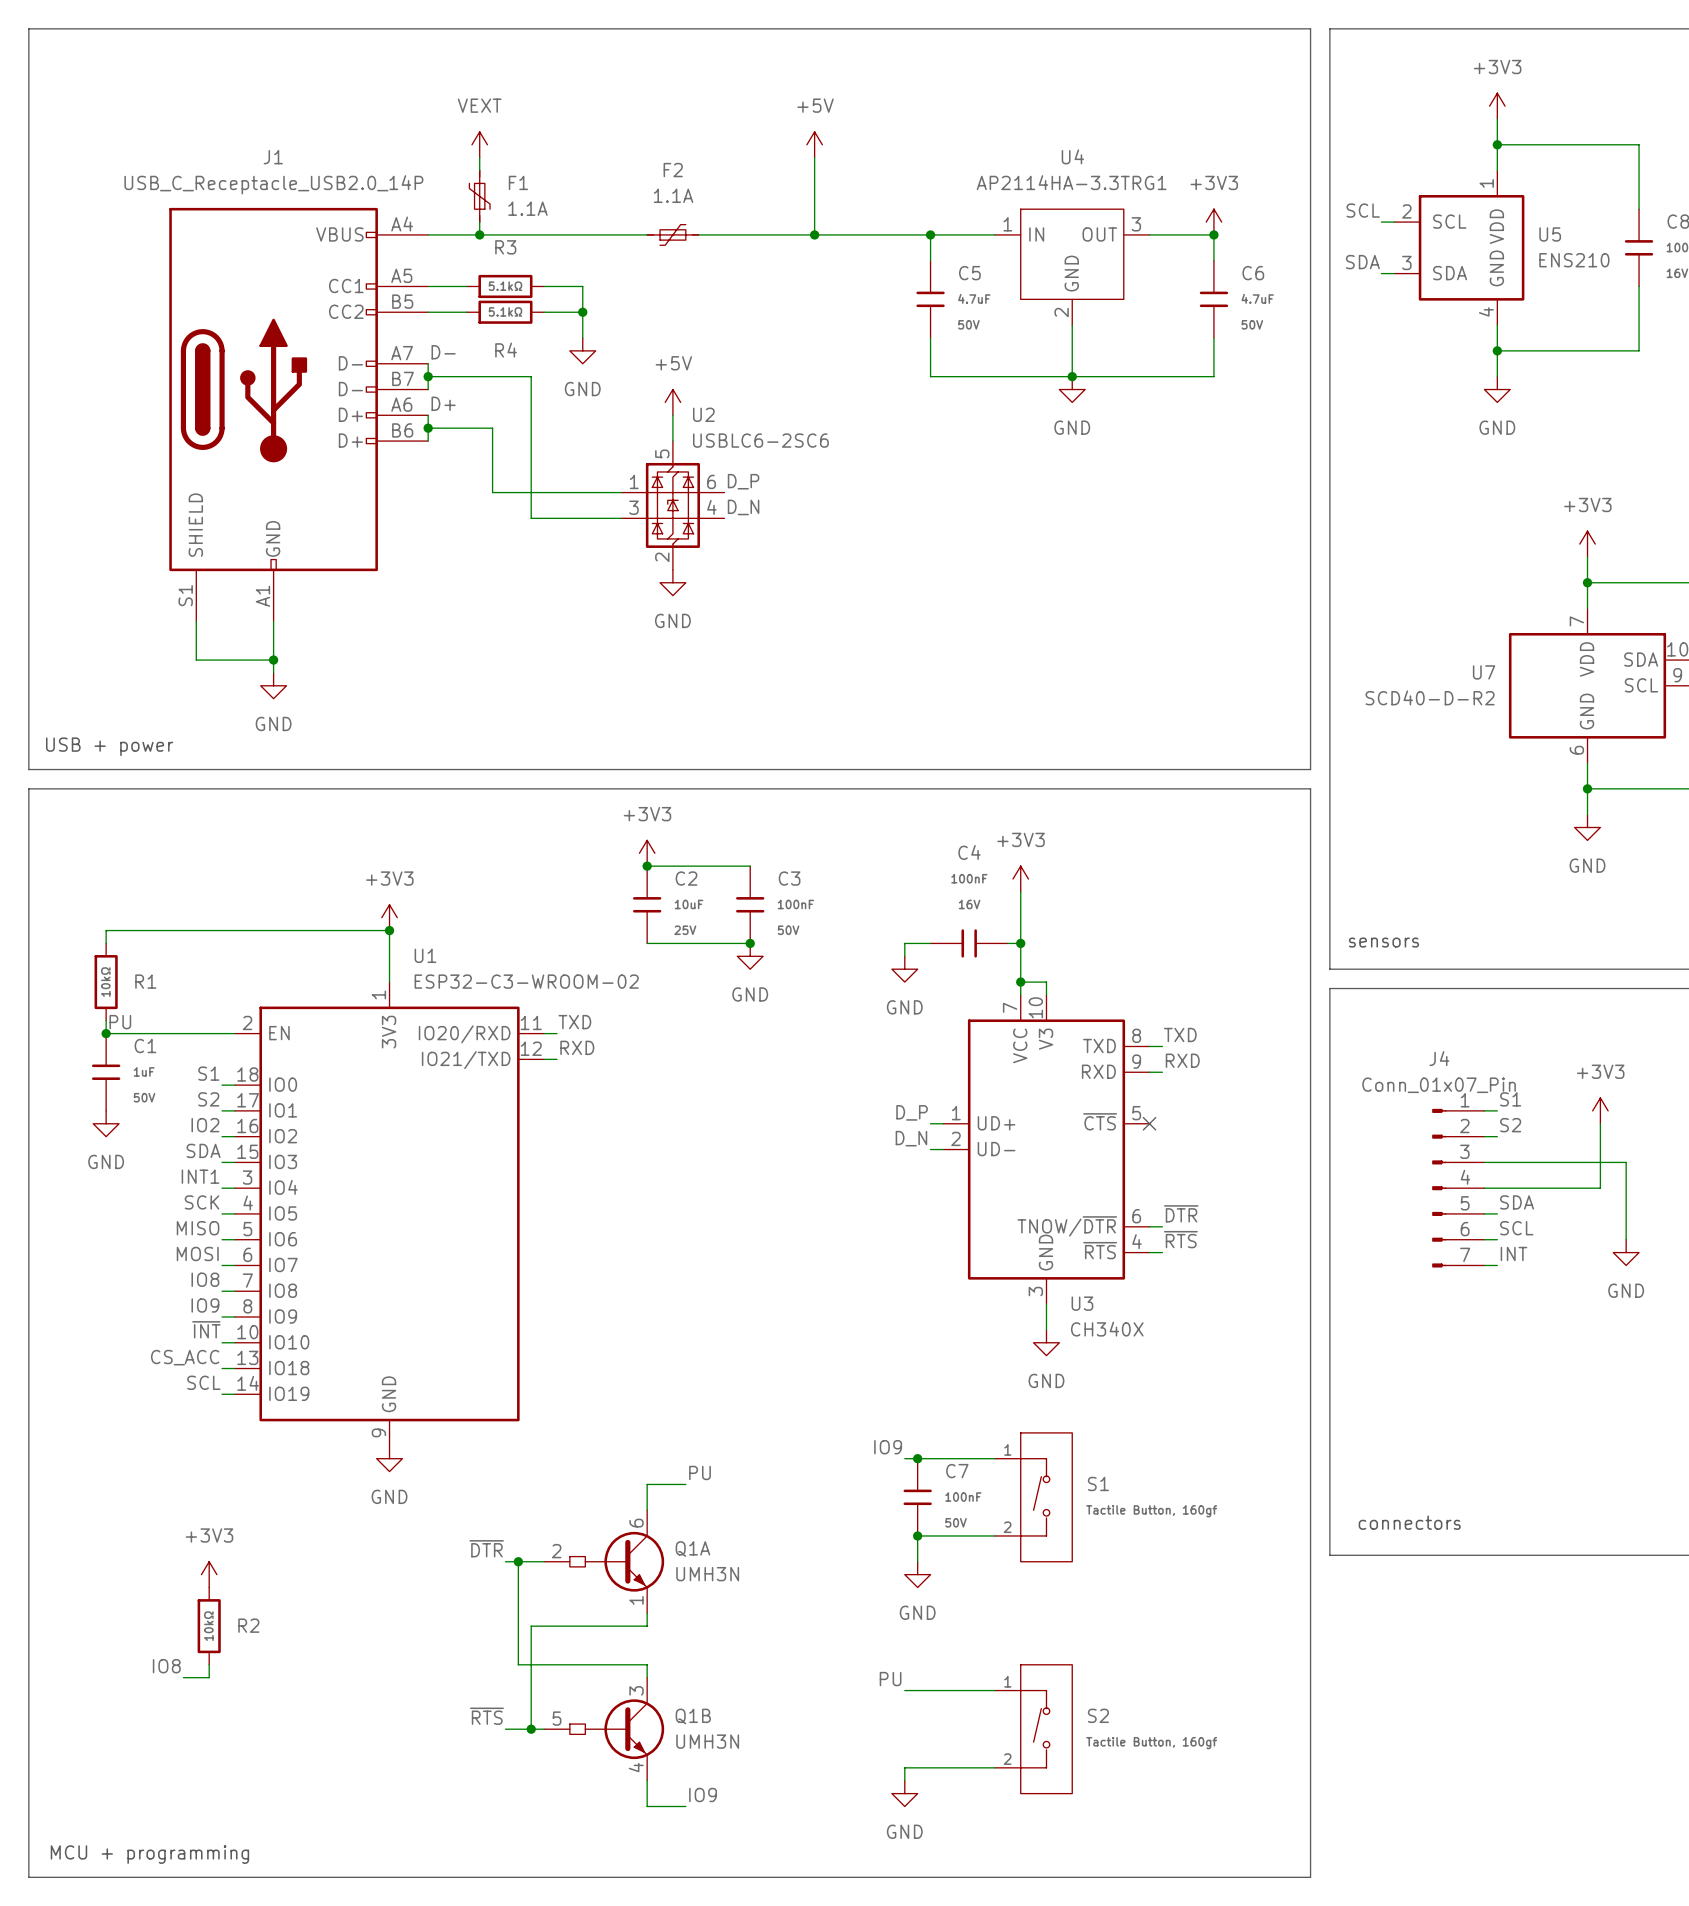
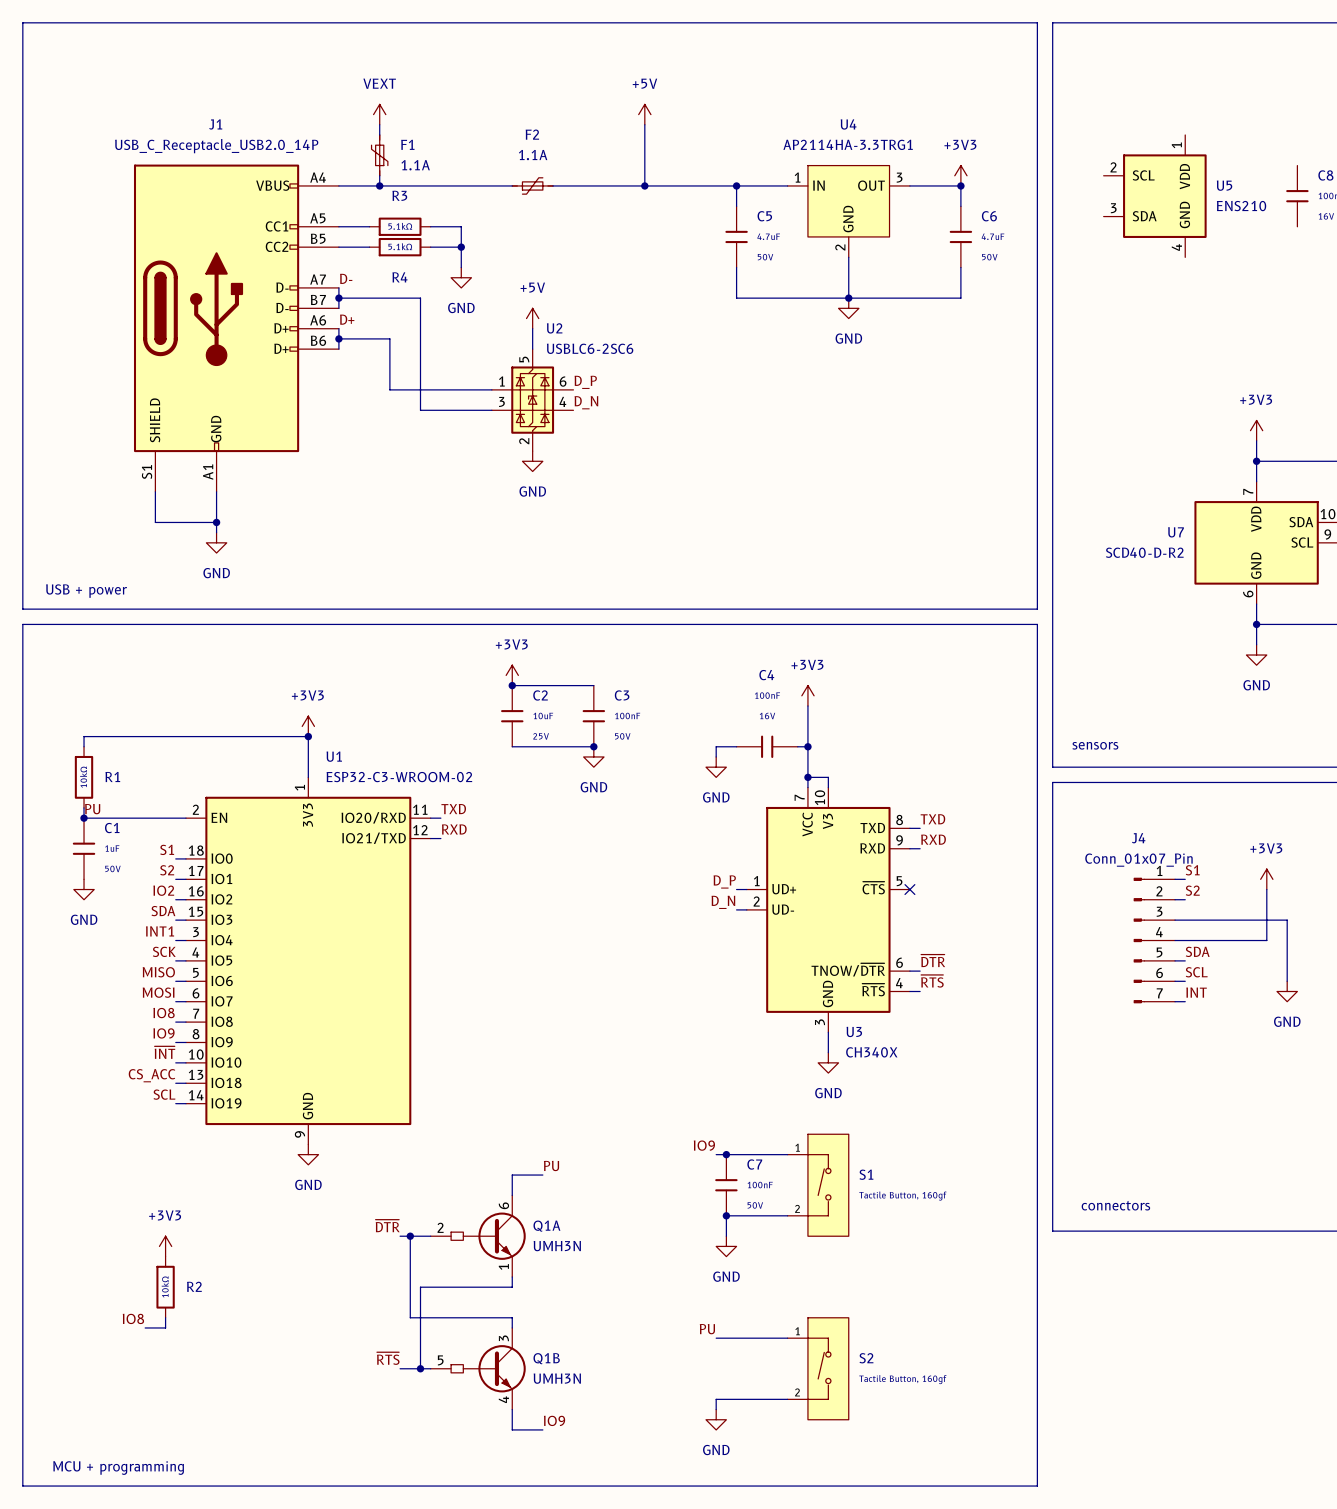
power symbol: +3V3 (1497, 106) -> none
wire: (1497, 119) (1497, 170) -> none
wire: (1497, 144) (1639, 144) (1639, 209) -> none
junction: (1497, 144) -> none
label: SCL (1363, 210) -> none
wire: (1381, 222) (1394, 222) -> none
label: SDA (1362, 262) -> none
wire: (1381, 273) (1394, 273) -> none
wire: (1639, 286) (1639, 350) (1497, 350) -> none
wire: (1497, 325) (1497, 376) -> none
junction: (1497, 350) -> none
power symbol: GND (1497, 389) -> none

